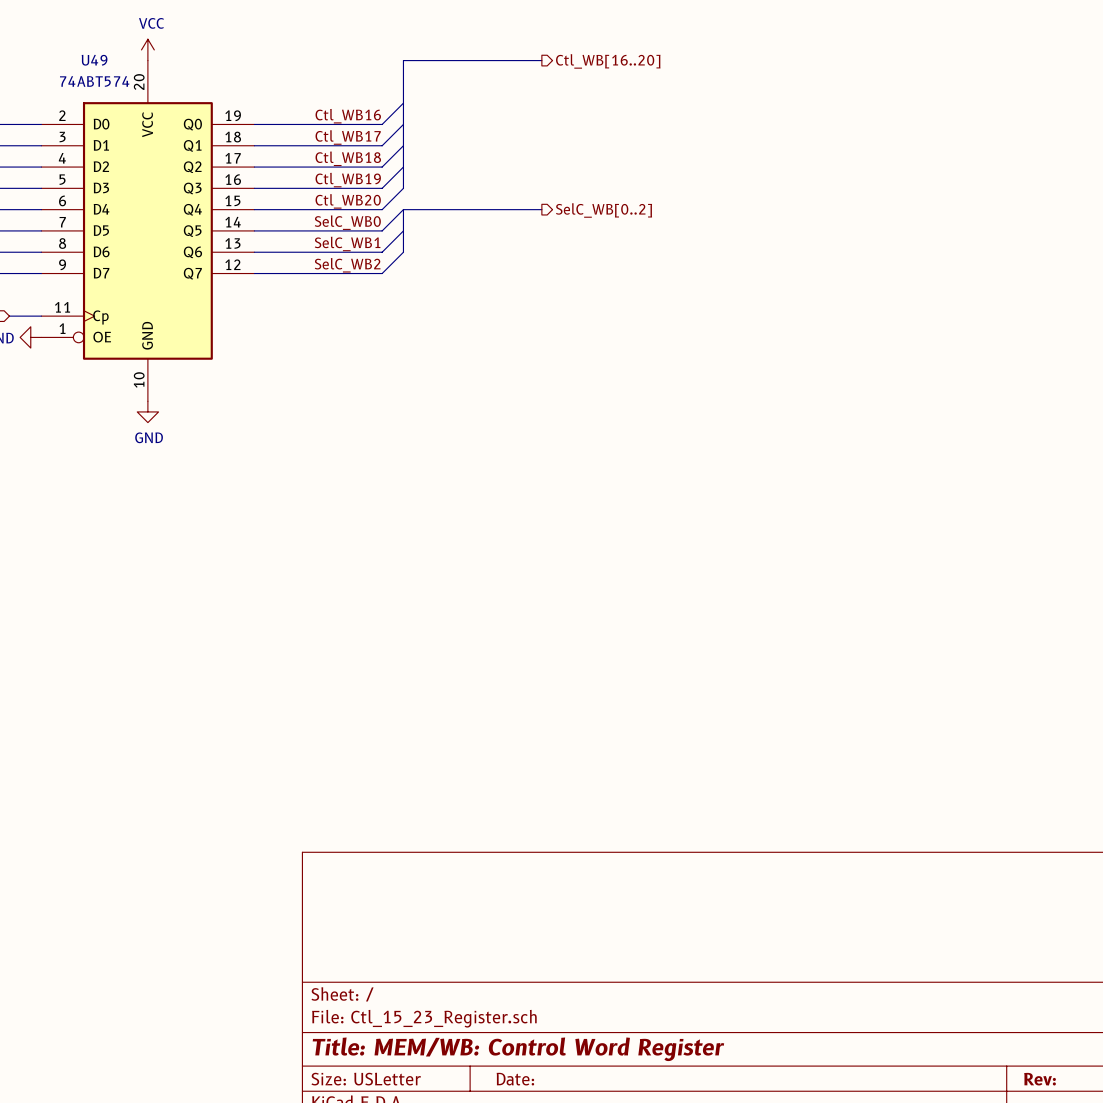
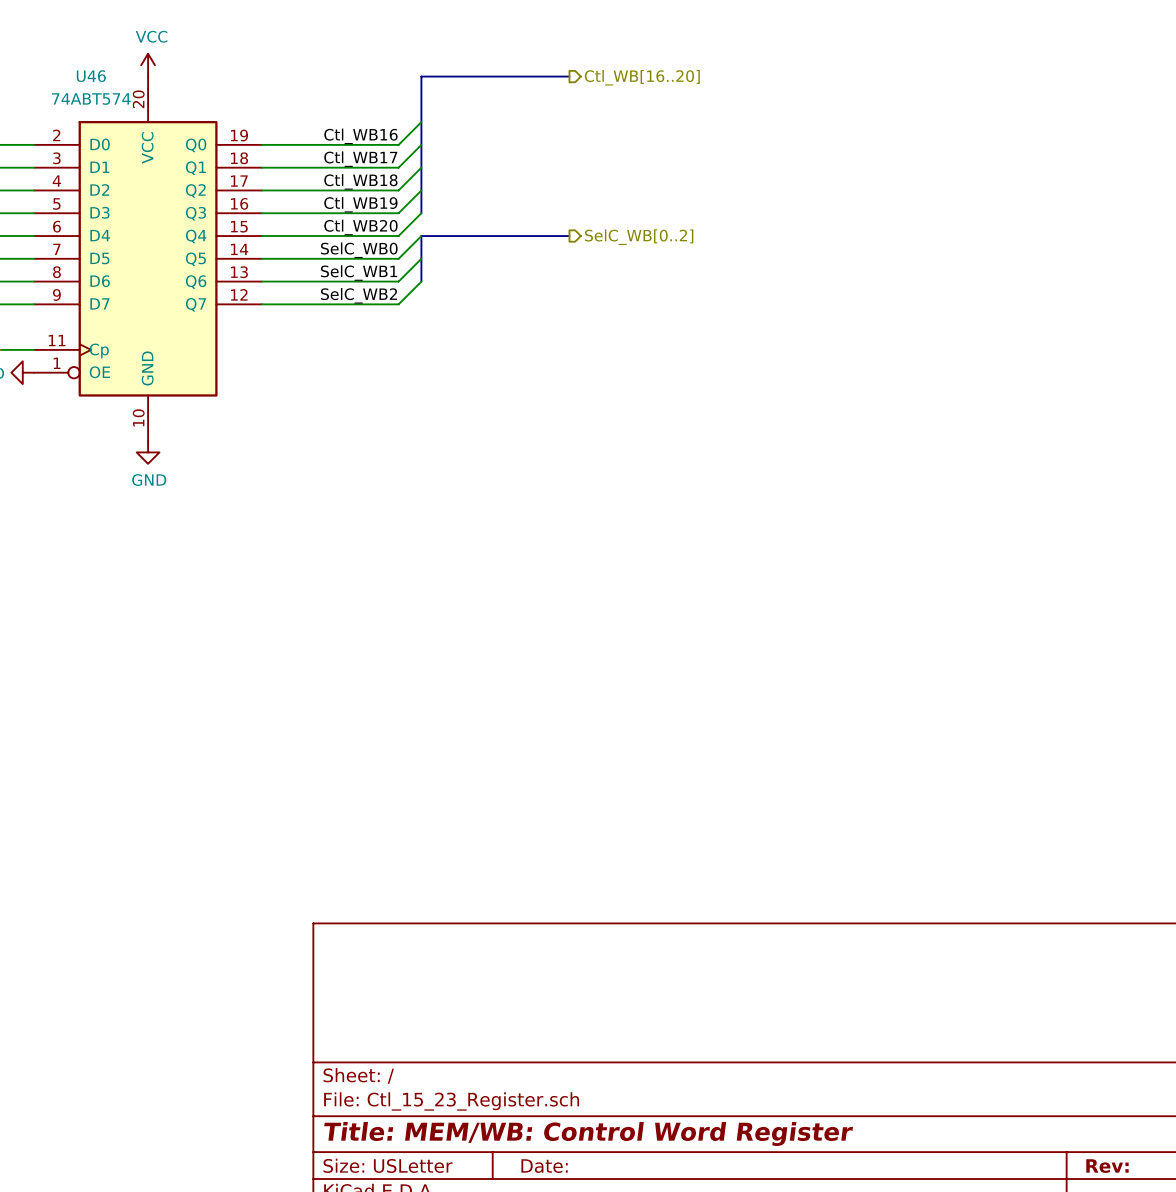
U49 name: U49 (94, 60) -> U46 (91, 76)

